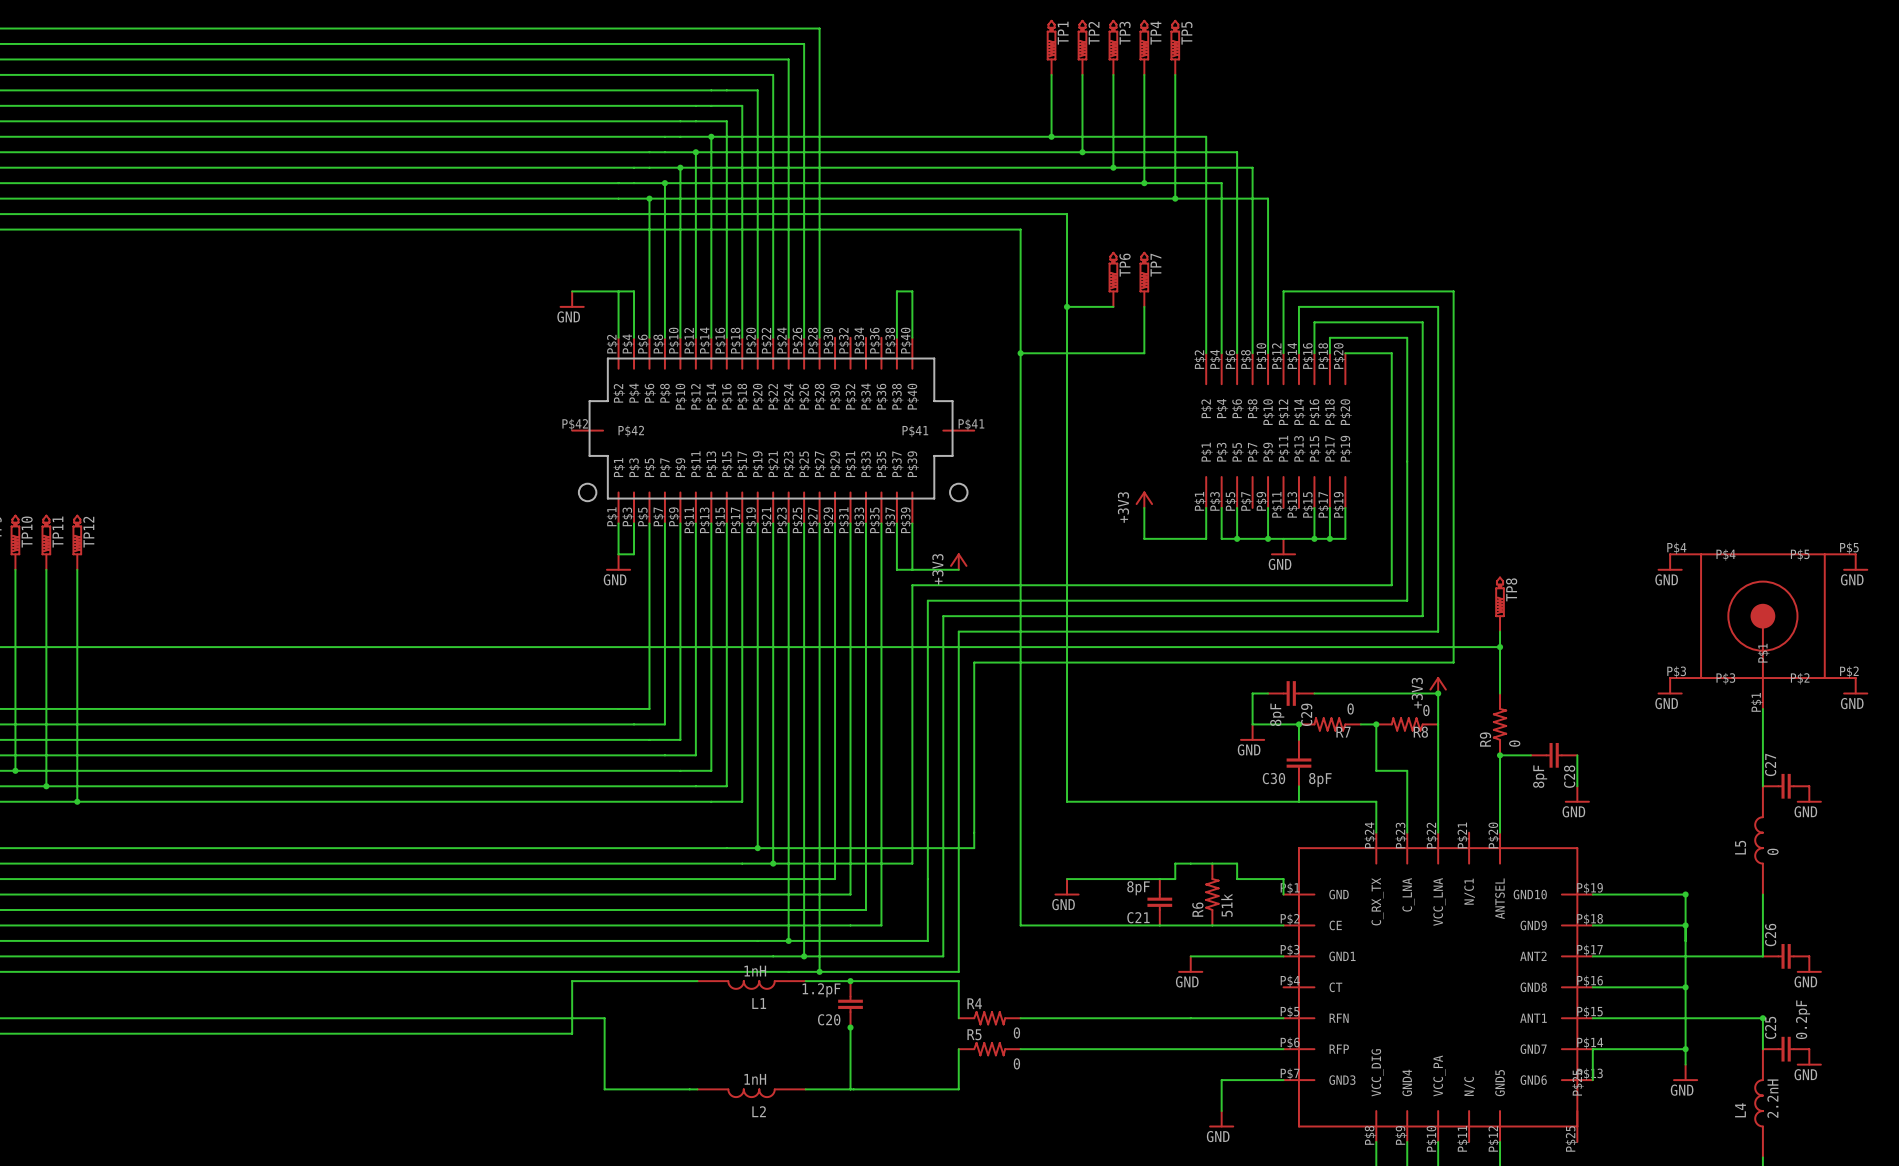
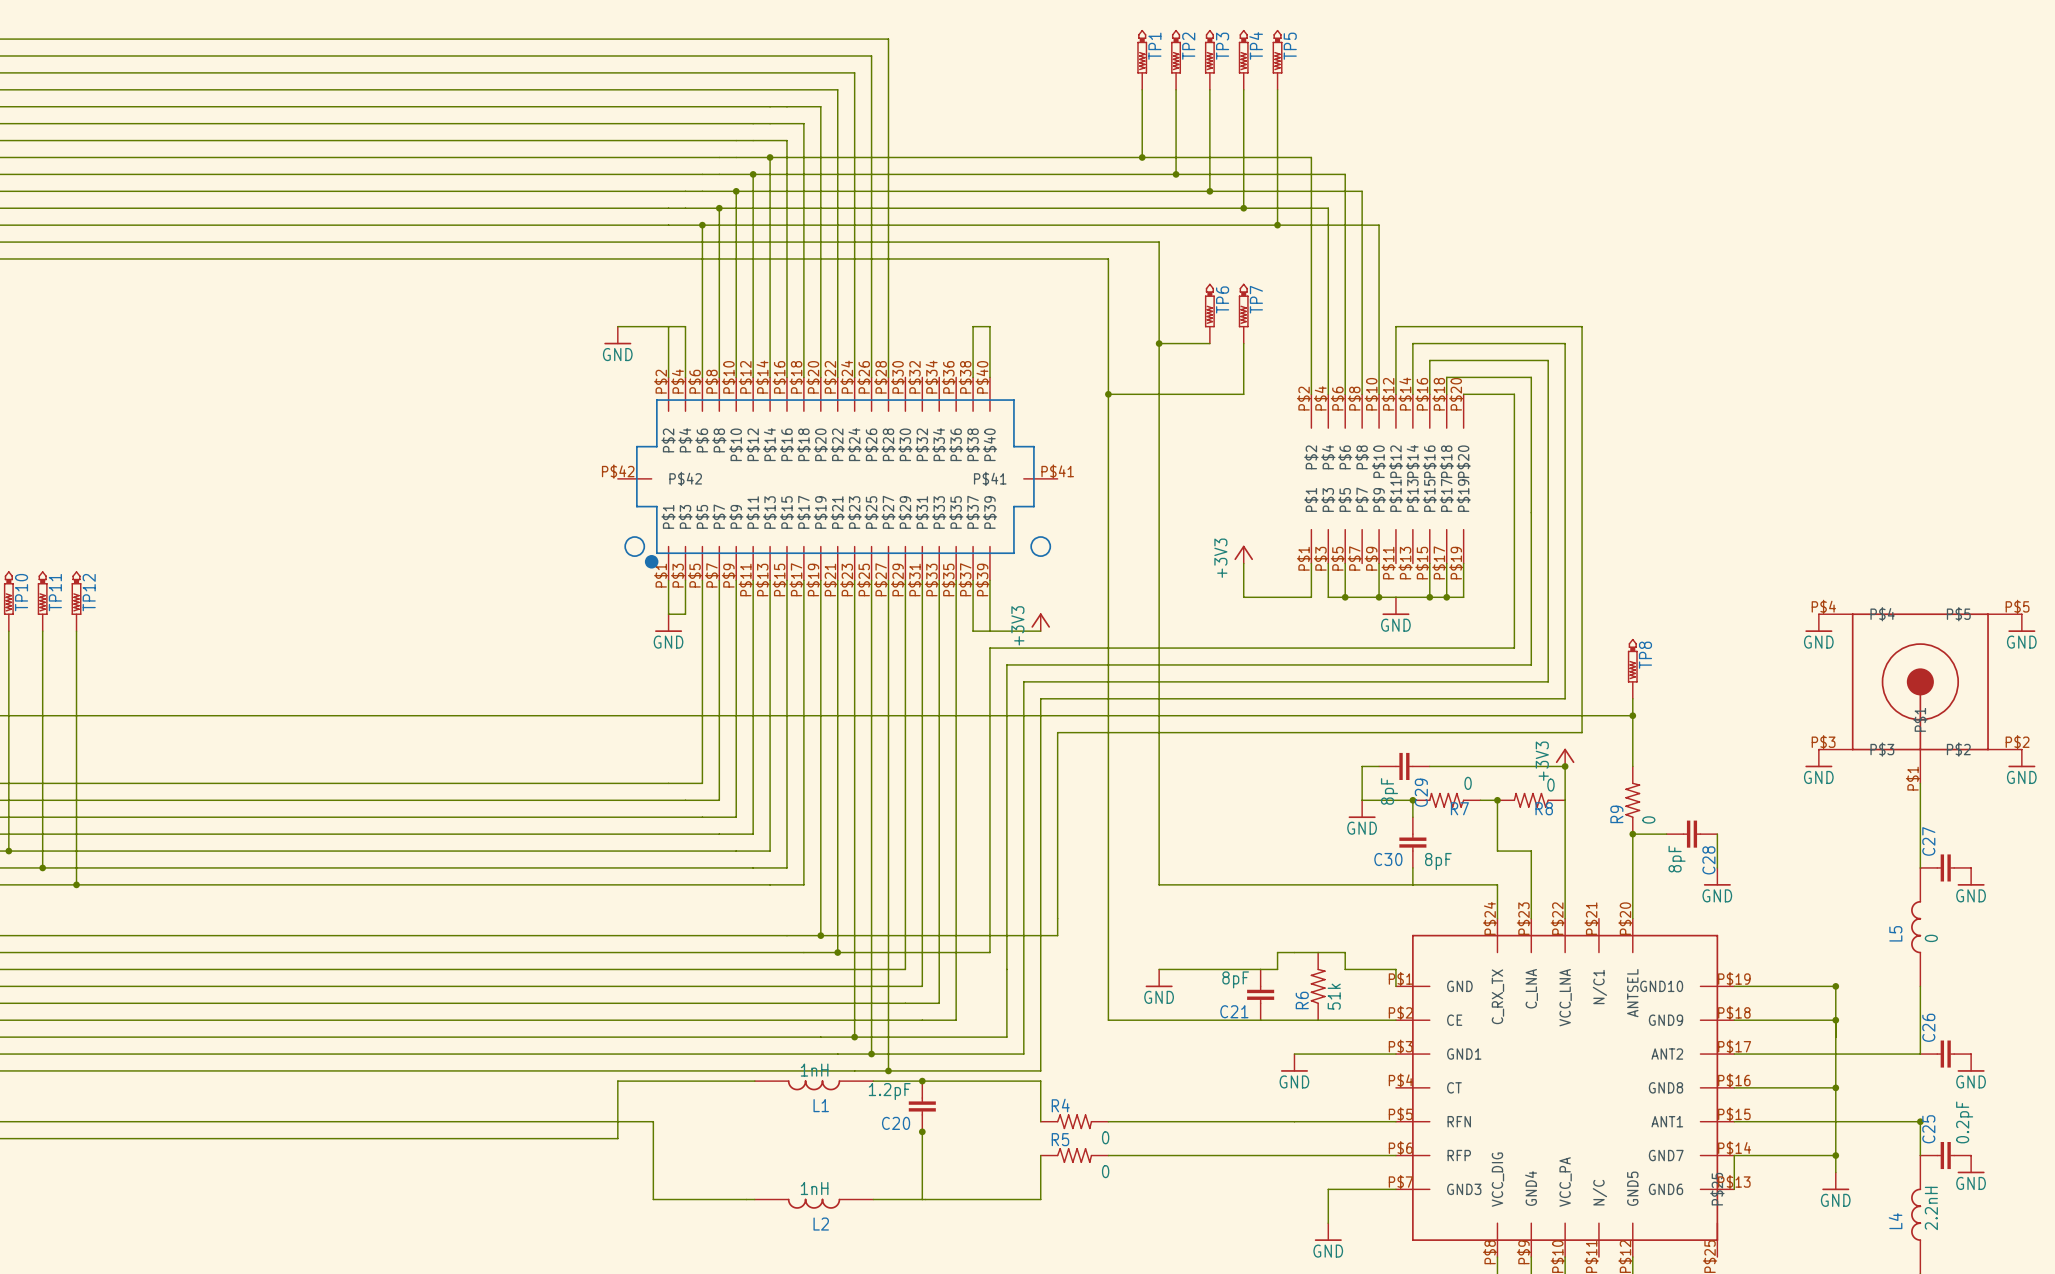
part symbol: [572, 337, 975, 524] -> [617, 377, 1058, 581]

